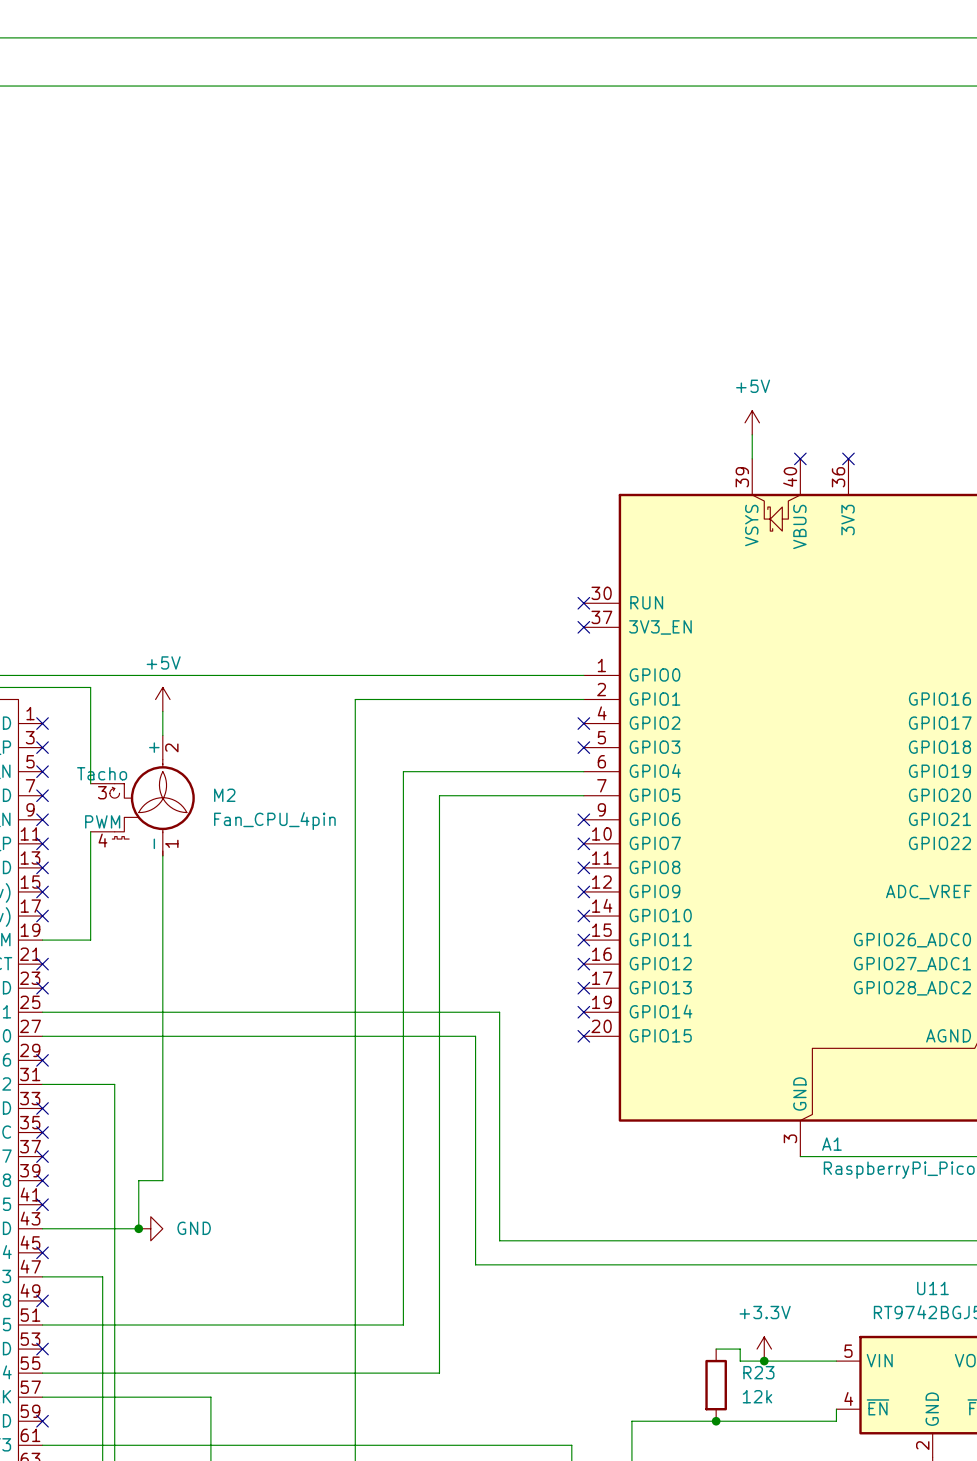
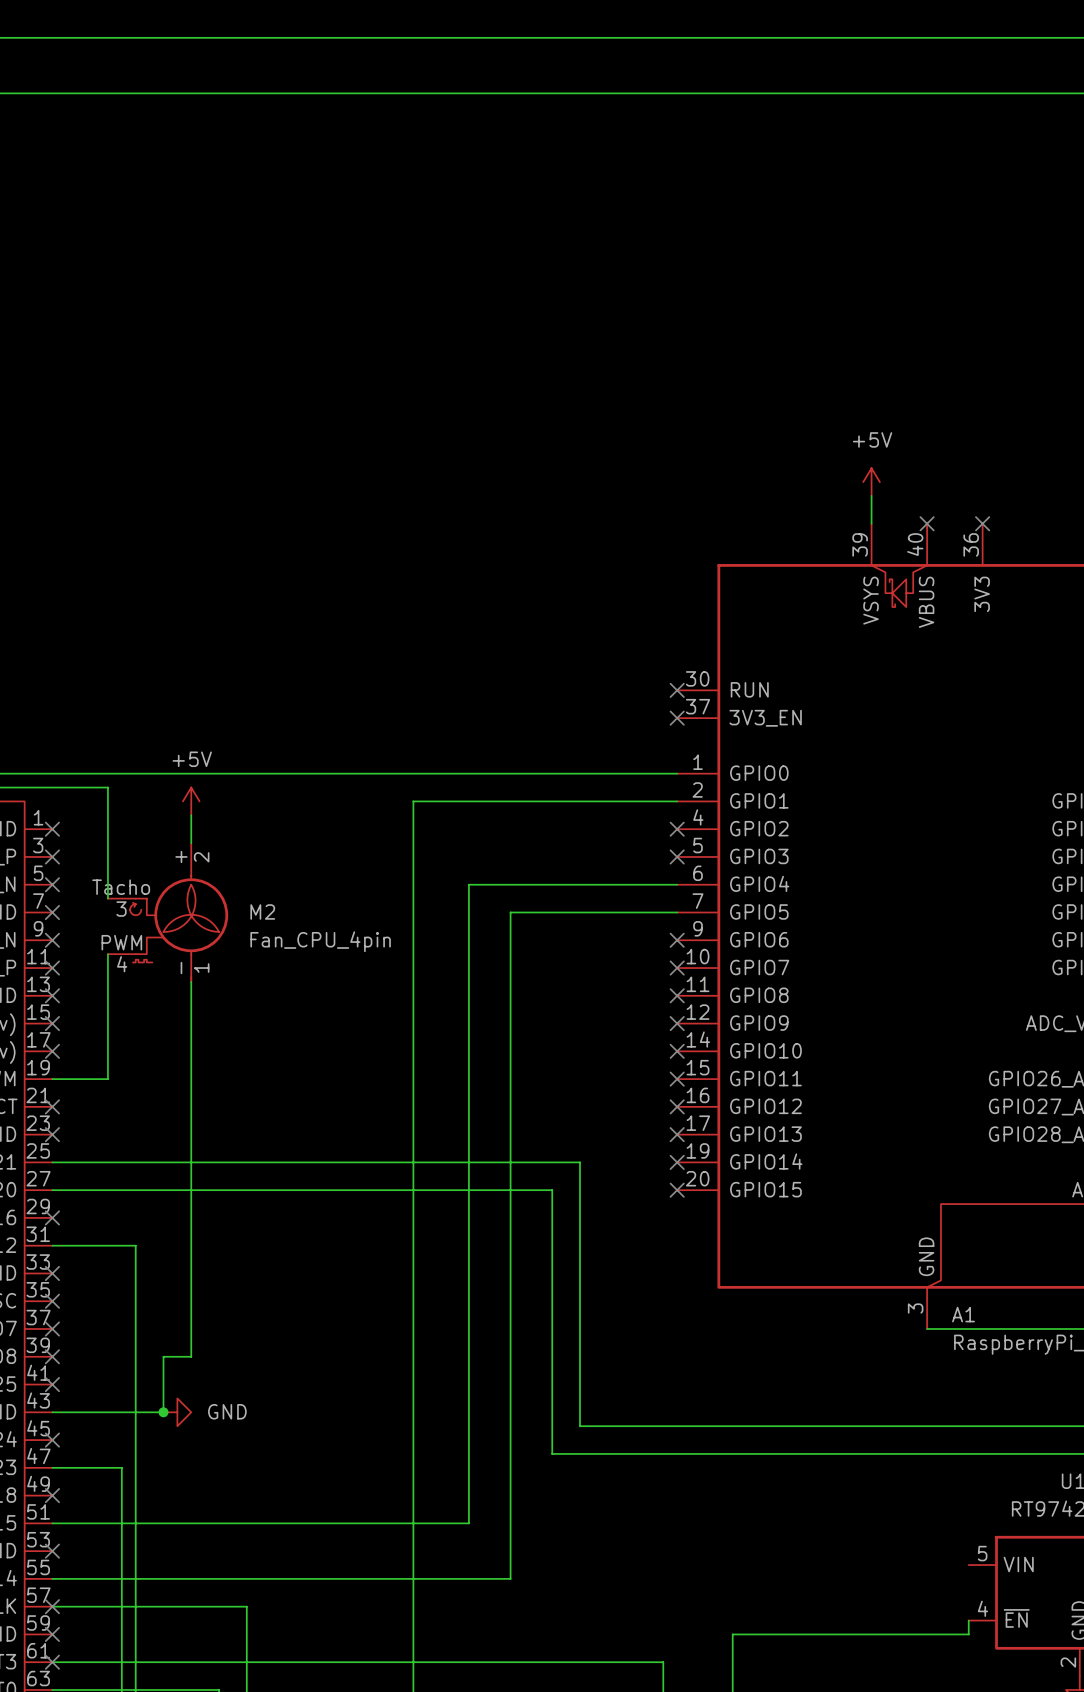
wire: (716, 1349) (740, 1349) (740, 1361) (836, 1361) -> none
power symbol: +3.3V (764, 1349) -> none
junction: (764, 1361) -> none
R23: 12k (716, 1385) -> none
no-connect mark: none -> (52, 1606)
junction: (716, 1421) -> none
no-connect mark: none -> (52, 1662)

